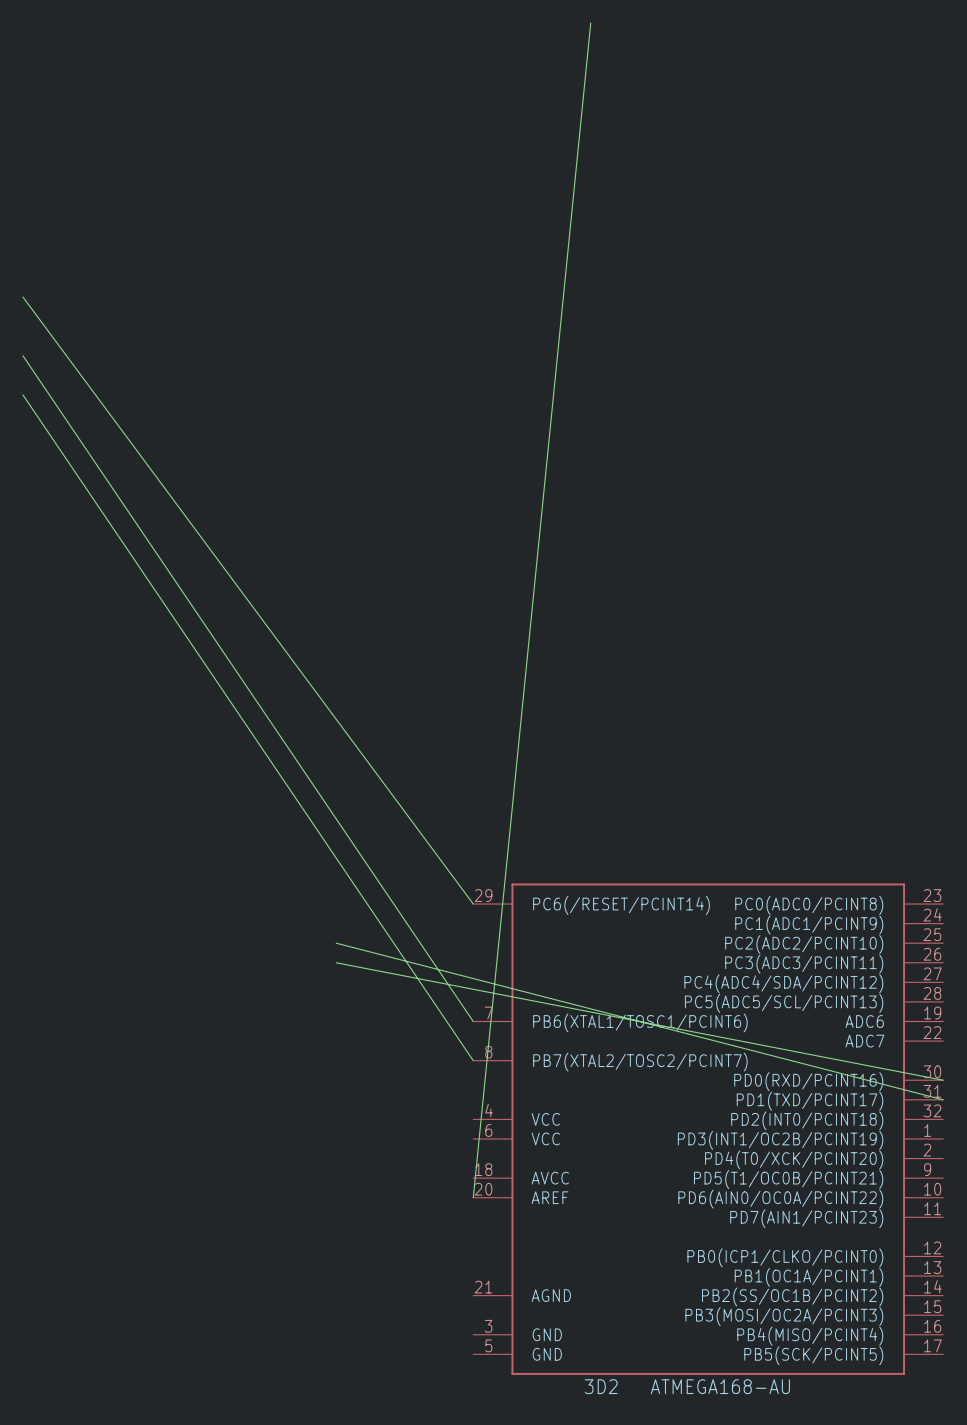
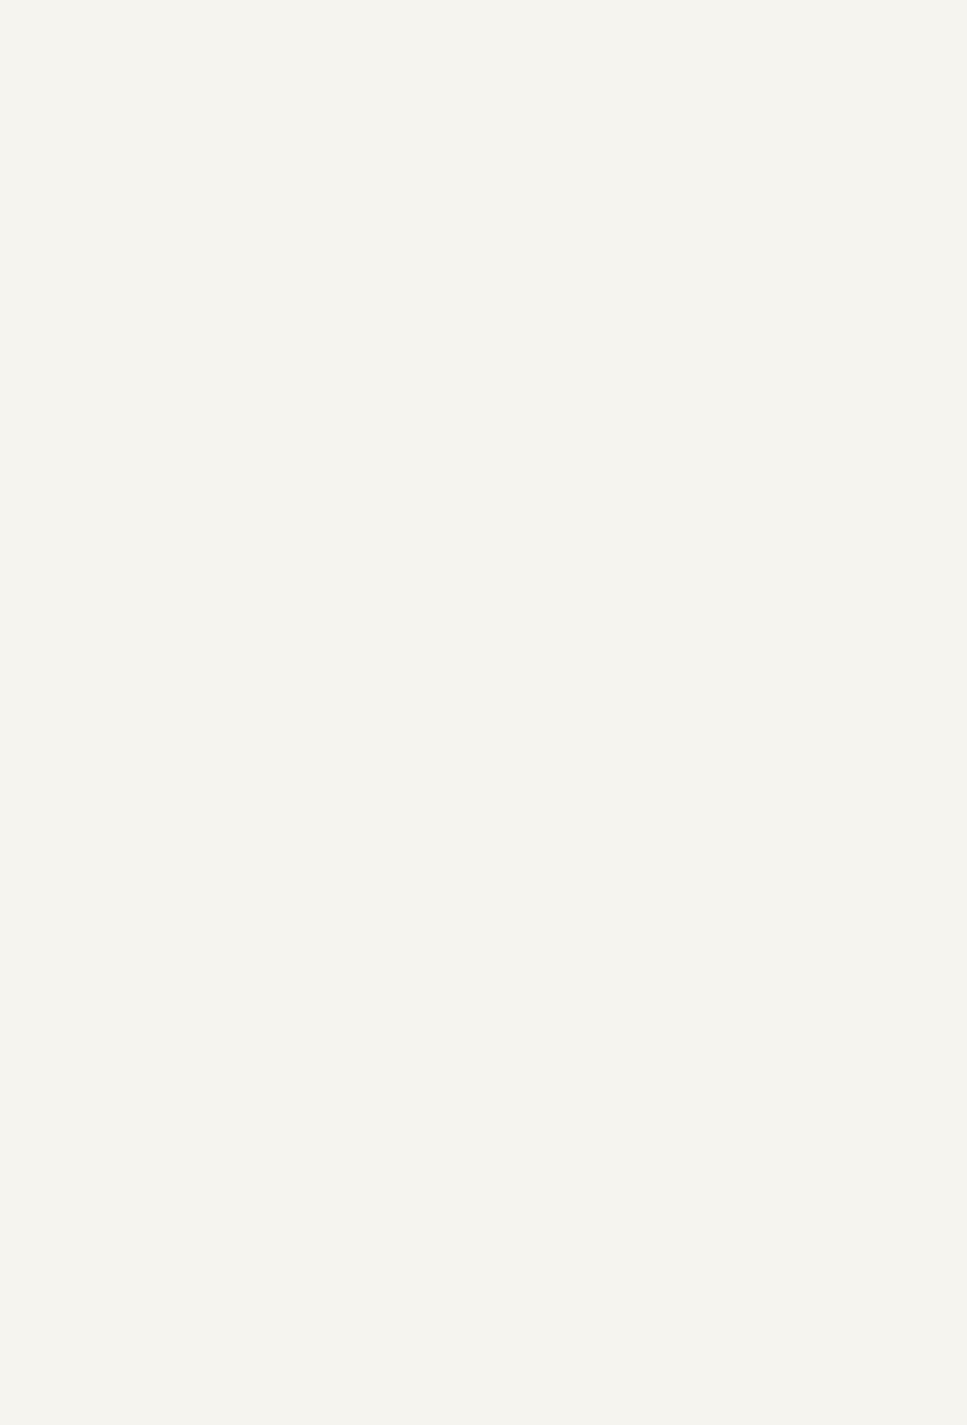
wire: (590, 22) (473, 1197) -> none
wire: (22, 297) (473, 904) -> none
wire: (22, 355) (473, 1021) -> none
wire: (22, 394) (473, 1060) -> none
wire: (336, 943) (943, 1099) -> none
wire: (336, 962) (943, 1080) -> none
3D2: ATMEGA168-AU (708, 1129) -> none

